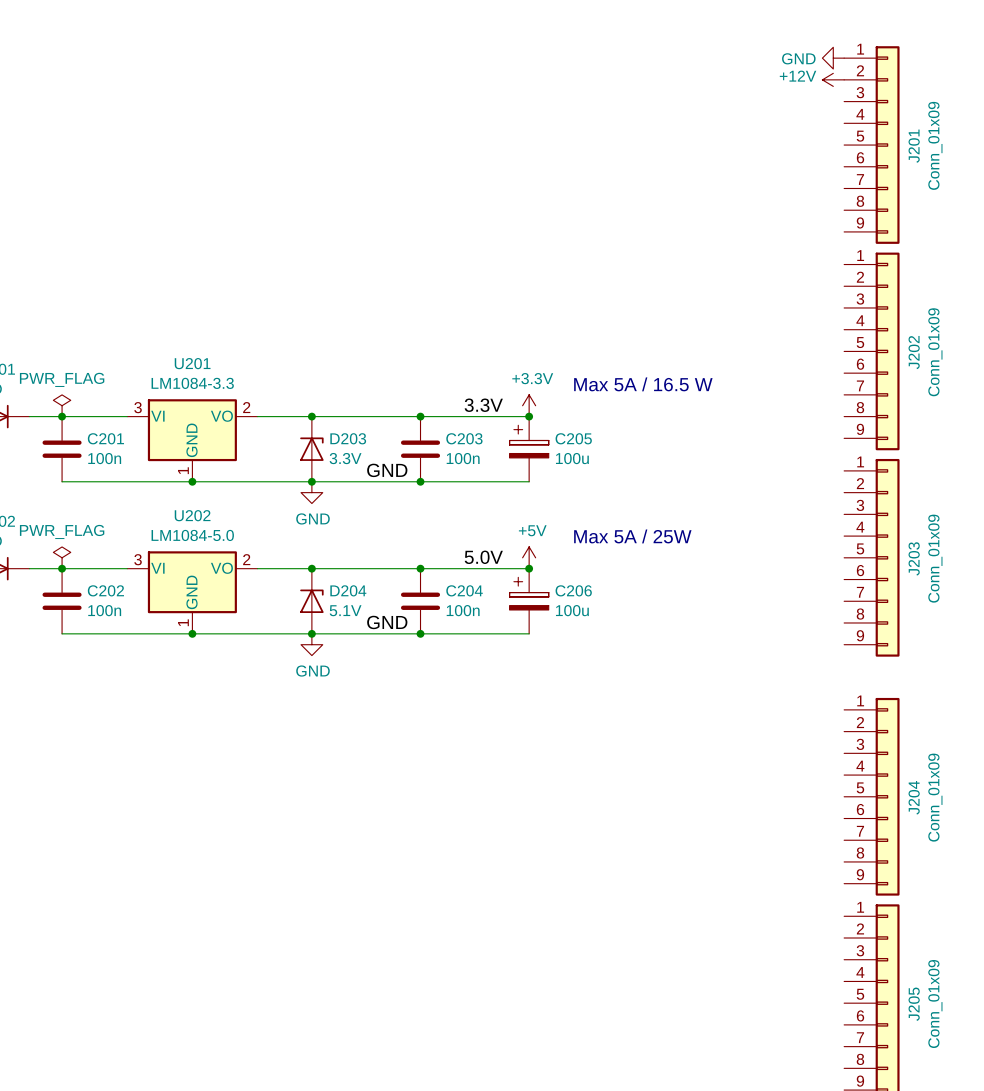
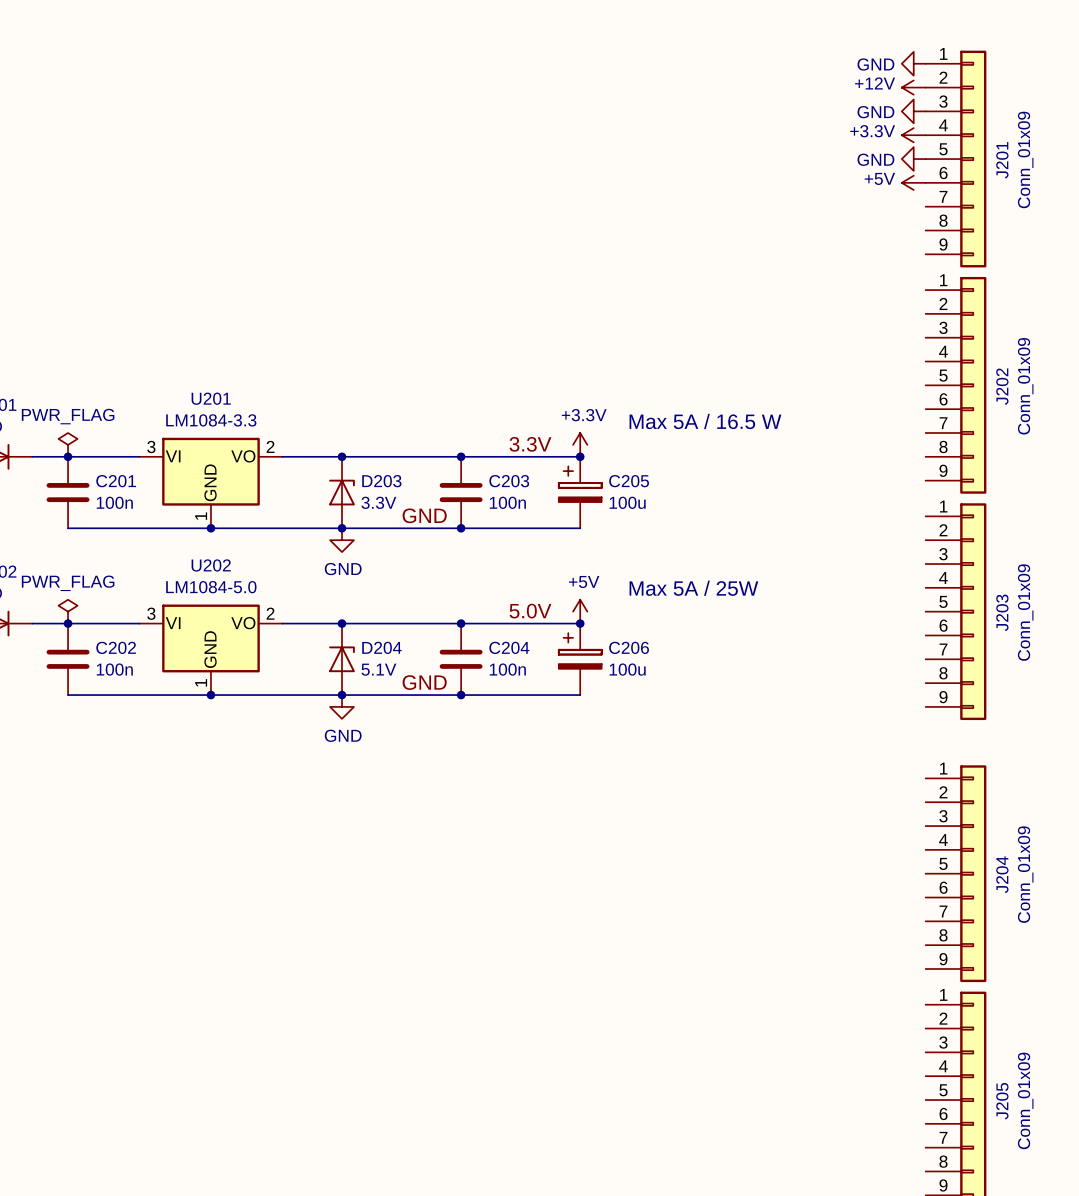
power symbol: none -> GND (913, 111)
power symbol: none -> +3.3V (913, 135)
power symbol: none -> GND (913, 159)
power symbol: none -> +5V (913, 182)

